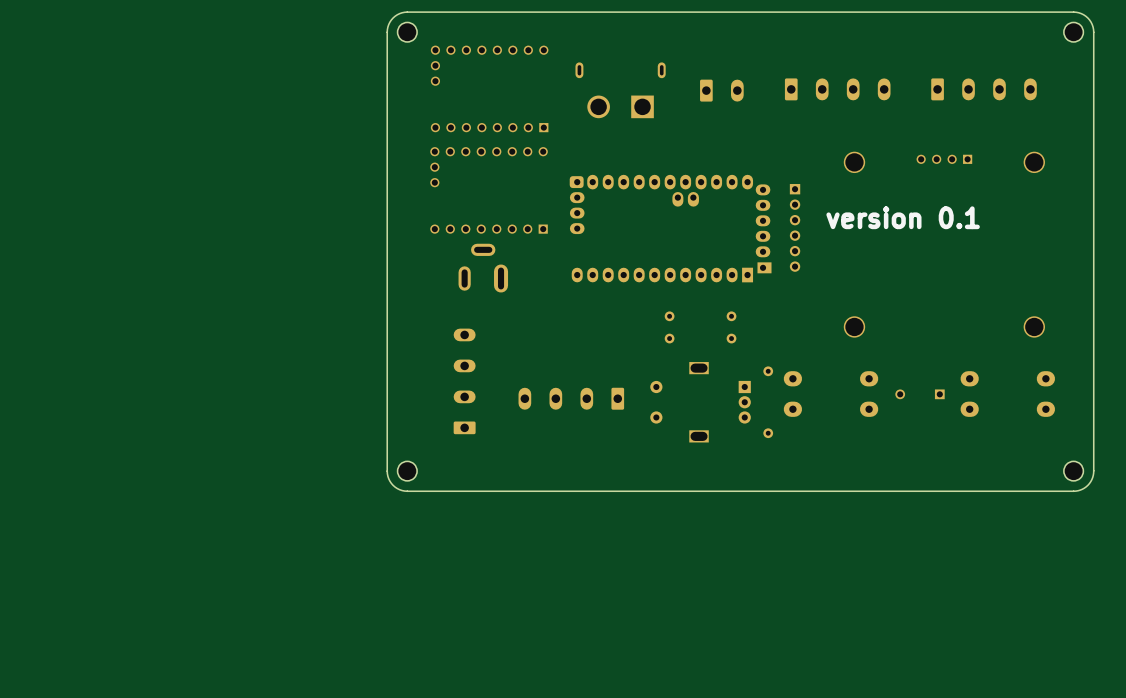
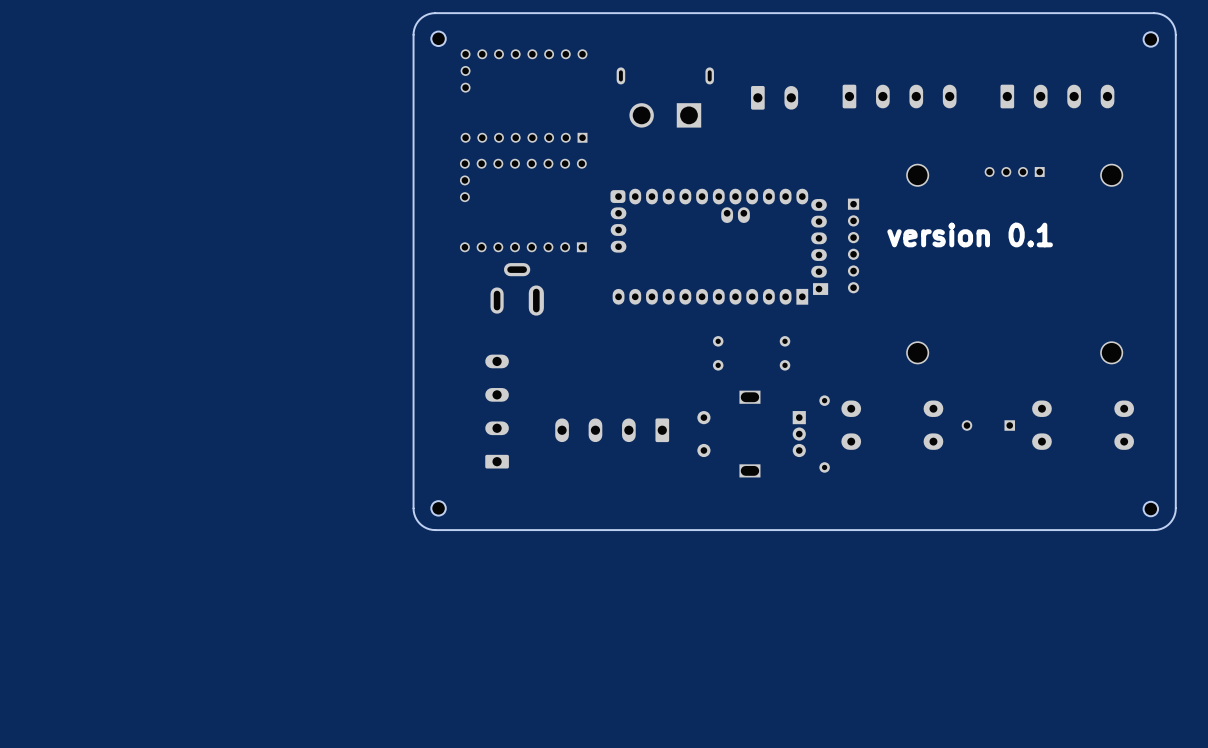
part footprint: [397, 22, 418, 42] -> [431, 31, 446, 47]
part footprint: [1063, 22, 1084, 42] -> [1143, 32, 1159, 47]
part footprint: [397, 461, 418, 481] -> [431, 501, 446, 516]
part footprint: [1063, 461, 1084, 481] -> [1143, 501, 1159, 517]

